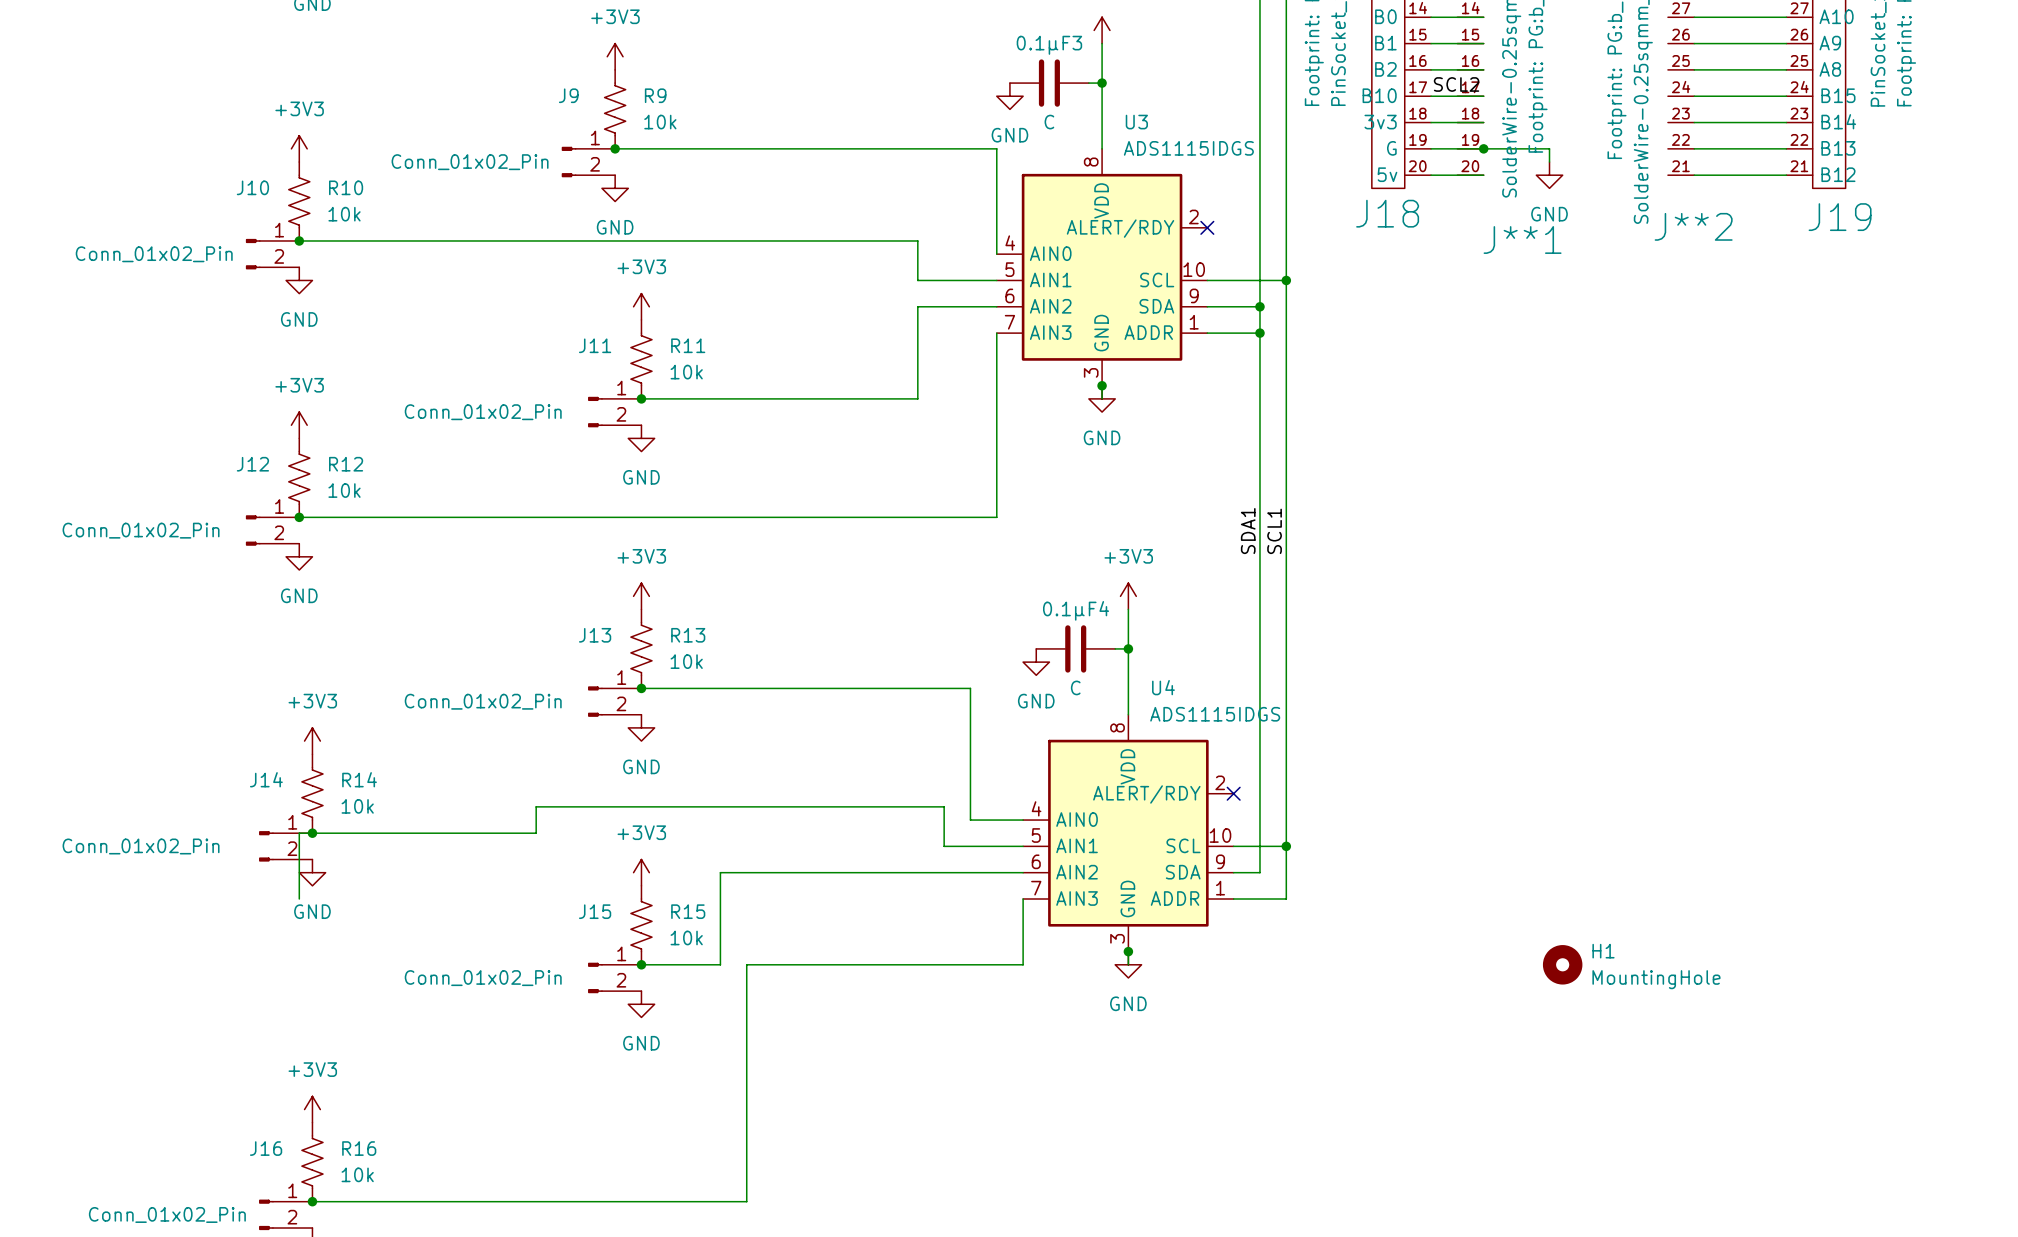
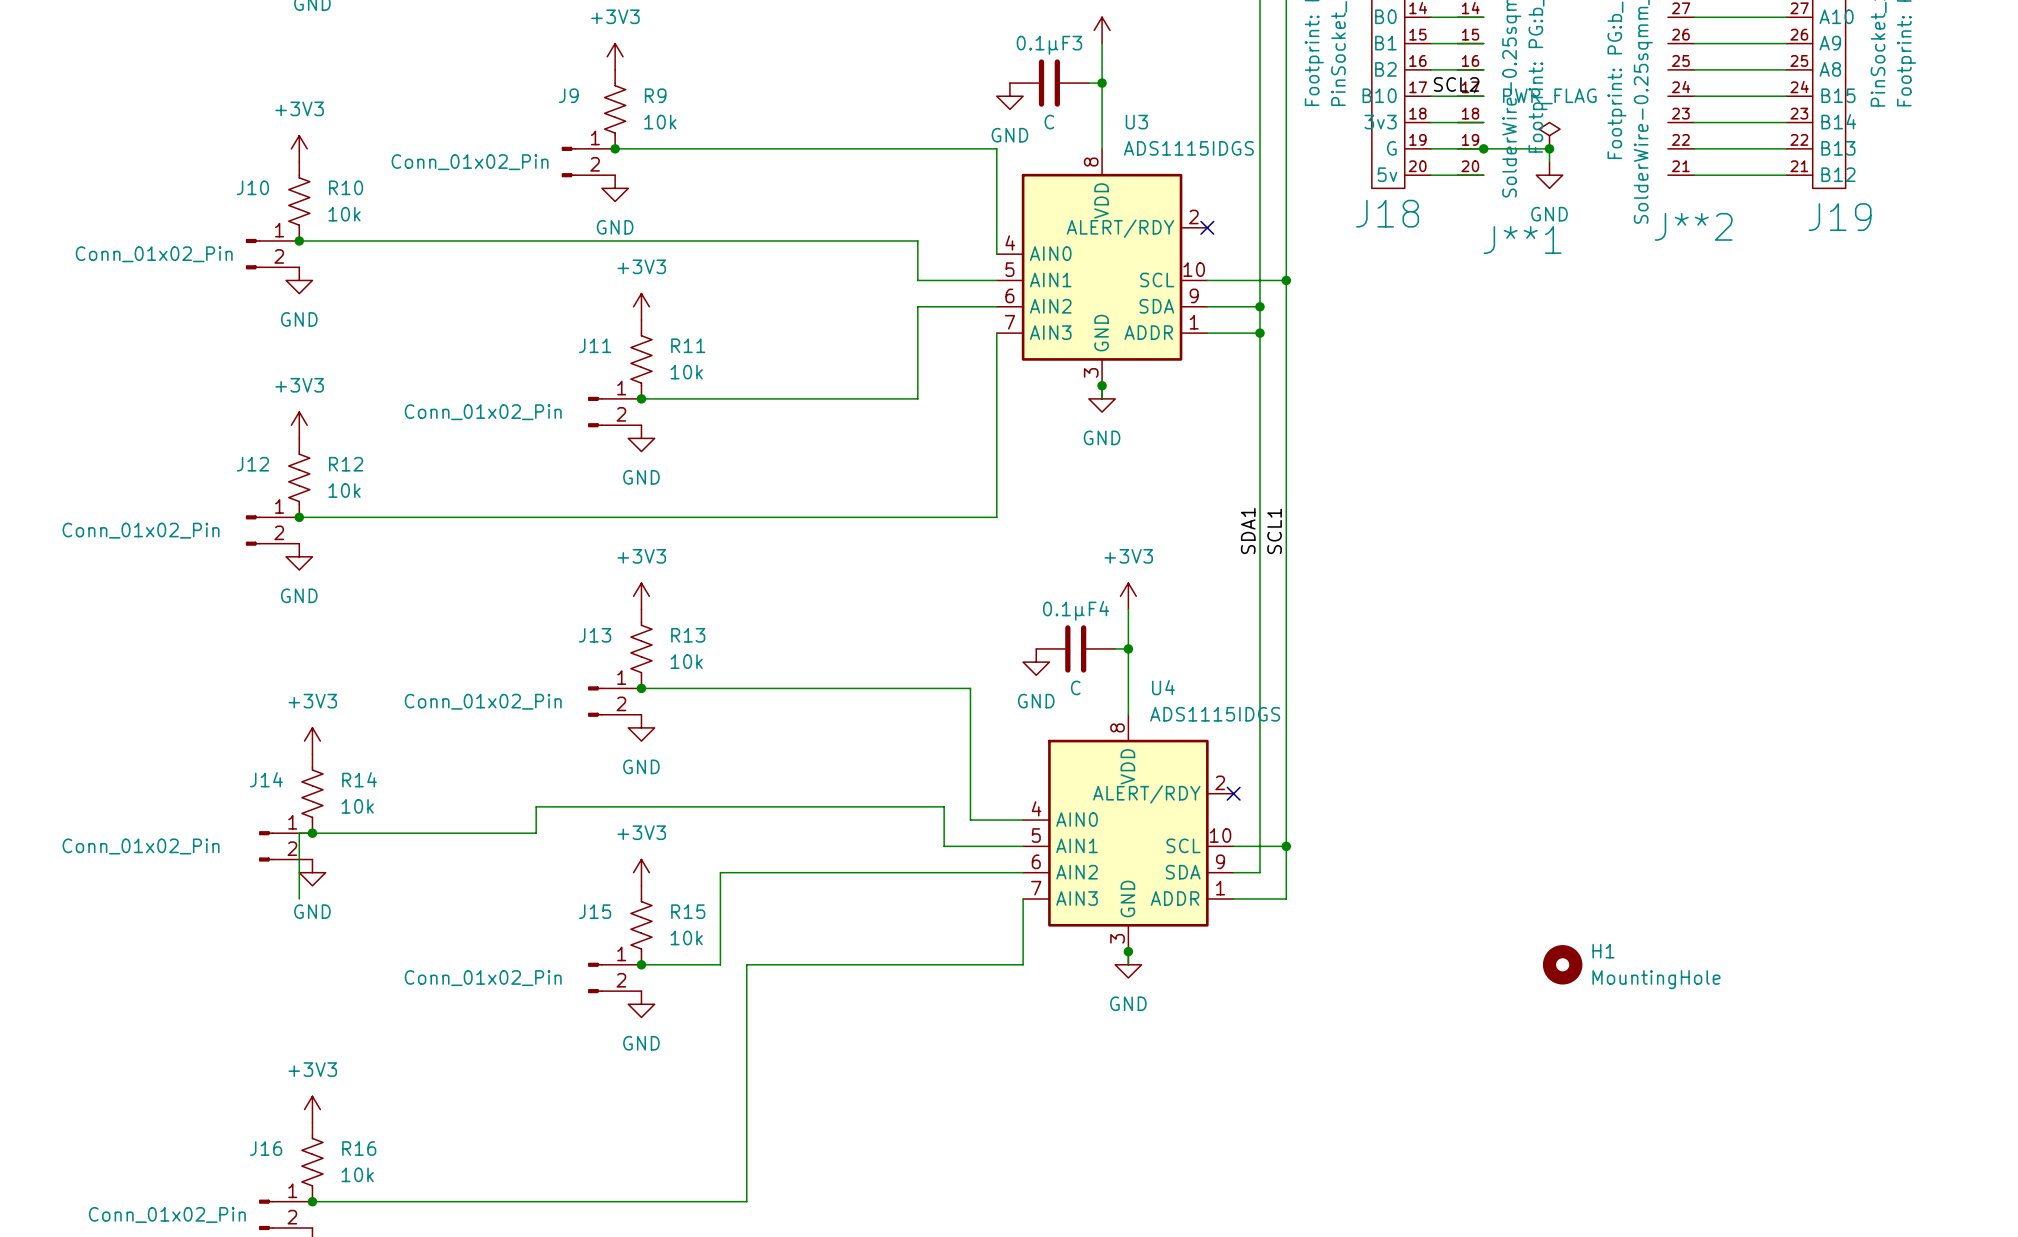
power symbol: none -> PWR_FLAG (1549, 135)
junction: none -> (1549, 148)

